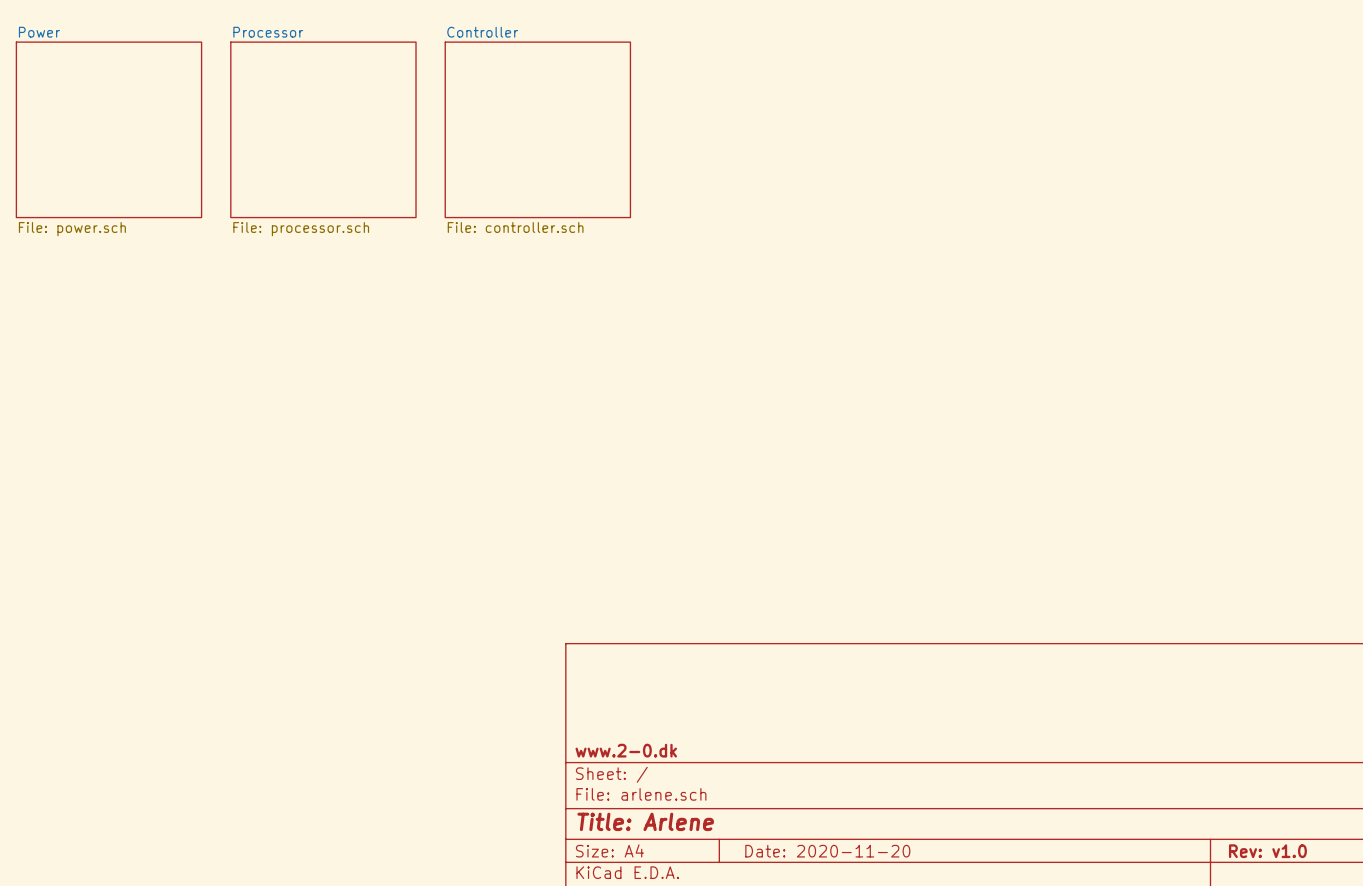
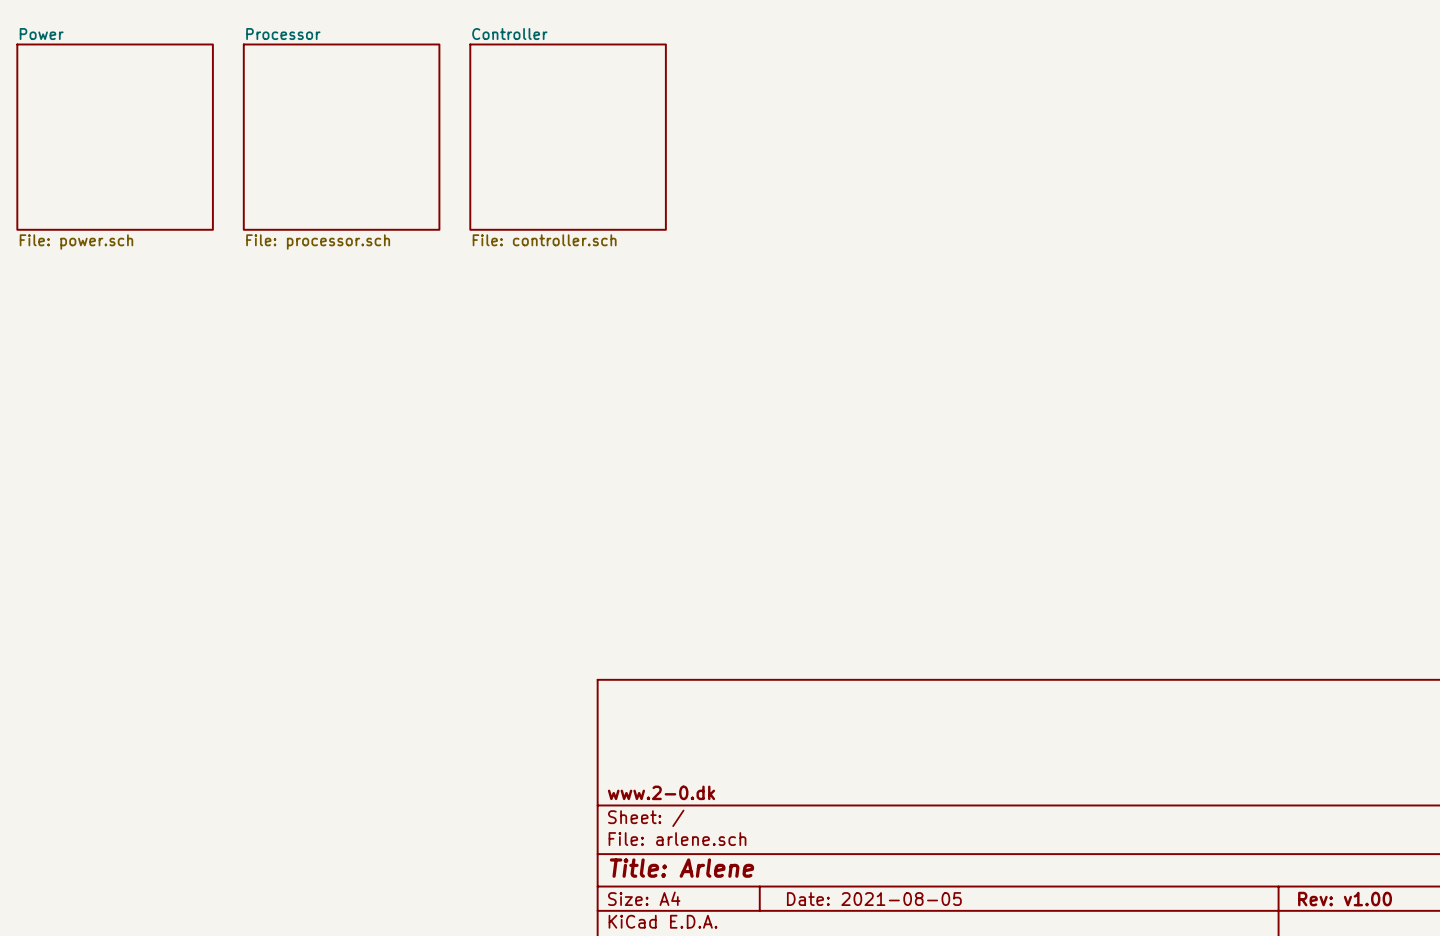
title block: Date: 2020-11-20 (827, 851) -> Date: 2021-08-05 (874, 899)
title block: Rev: v1.0 (1267, 851) -> Rev: v1.00 (1345, 899)

